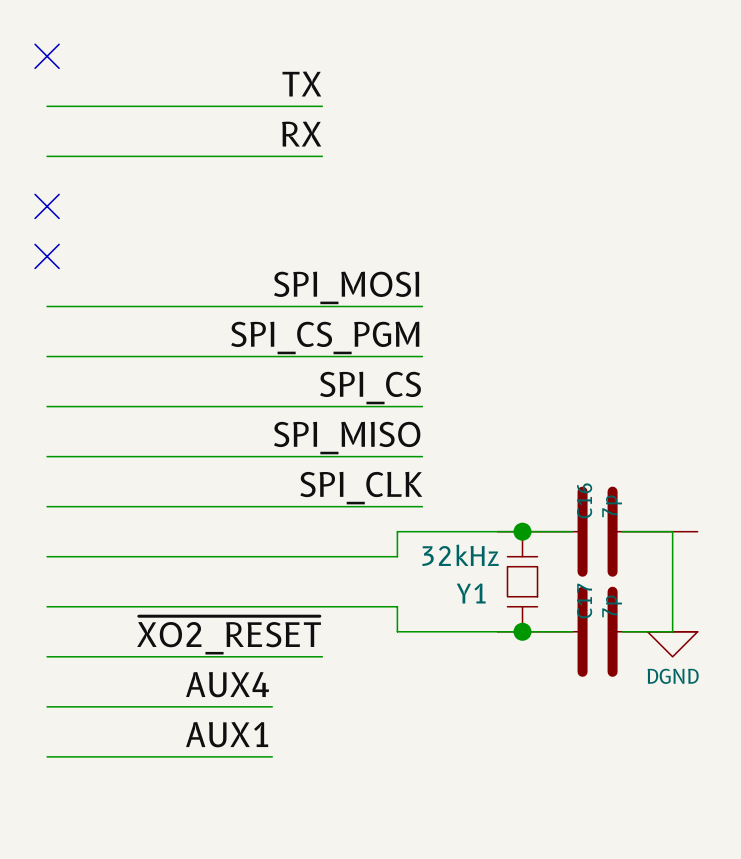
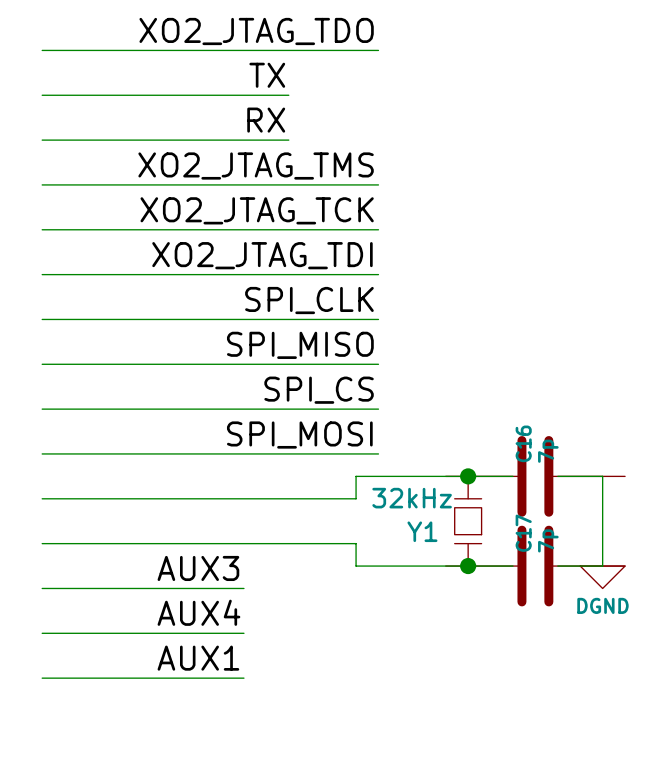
label: none -> XO2_JTAG_TDO (256, 31)
wire: none -> (42, 50) (378, 50)
no-connect mark: (47, 56) -> none
label: none -> XO2_JTAG_TMS (256, 166)
wire: none -> (42, 184) (378, 184)
no-connect mark: (47, 206) -> none
label: none -> XO2_JTAG_TCK (257, 210)
wire: none -> (42, 229) (378, 229)
no-connect mark: (47, 256) -> none
label: SPI_MOSI (346, 287) -> XO2_JTAG_TDI (262, 255)
label: SPI_CS_PGM (325, 337) -> SPI_CLK (309, 300)
label: SPI_CS (370, 388) -> SPI_MISO (300, 345)
label: SPI_MISO (347, 438) -> SPI_CS (319, 390)
label: SPI_CLK (361, 488) -> SPI_MOSI (299, 435)
label: none -> AUX3 (198, 568)
label: ~{XO2_RESET} (229, 635) -> none
wire: (272, 656) (322, 656) -> none

